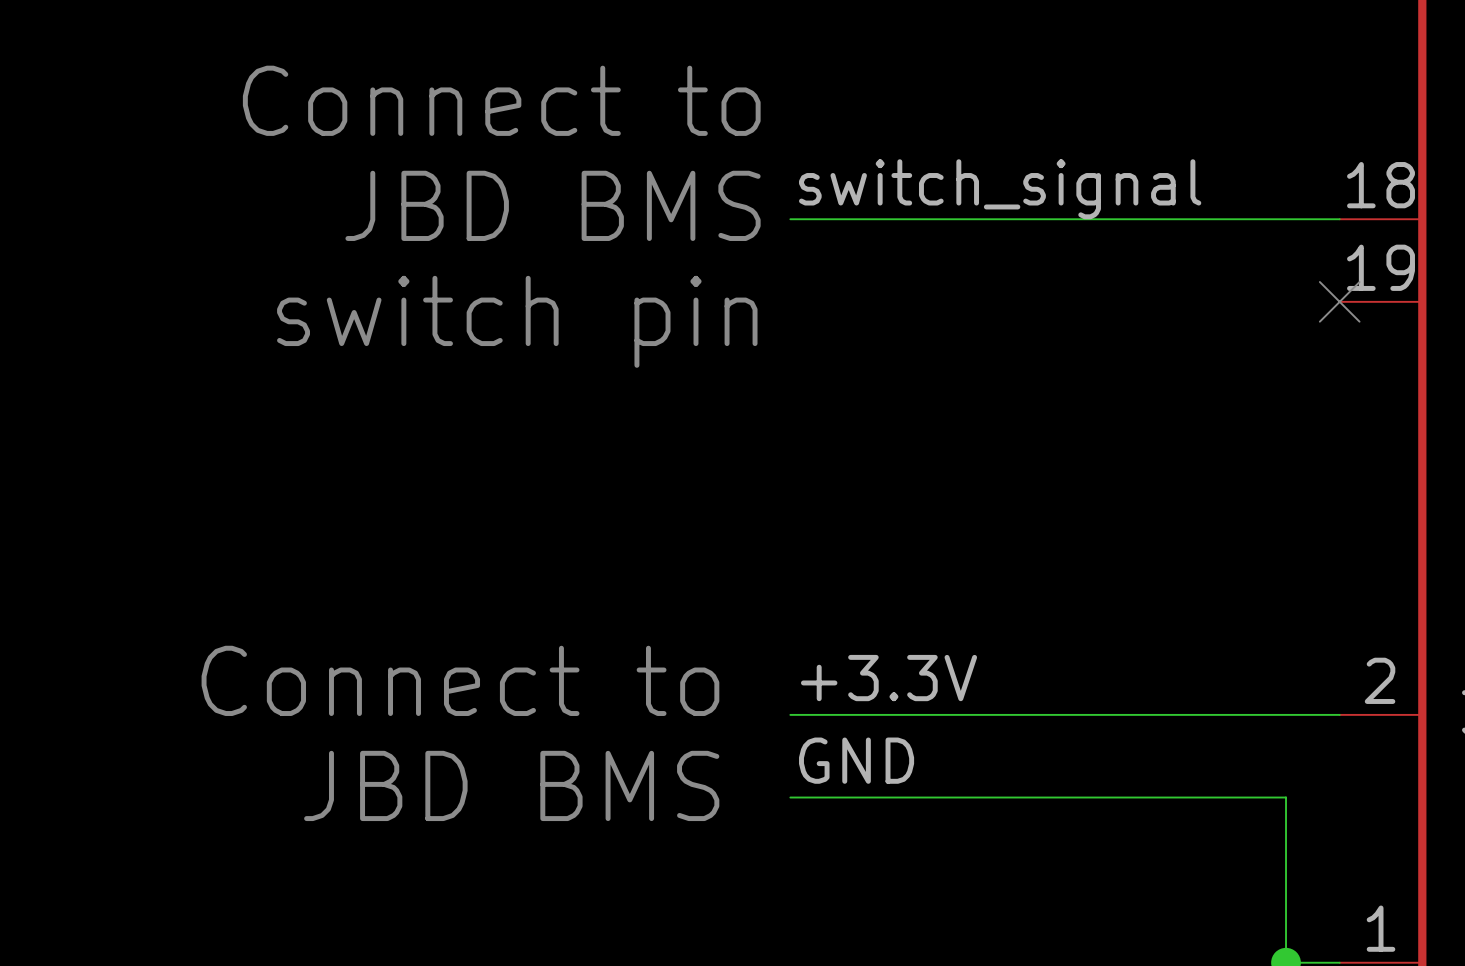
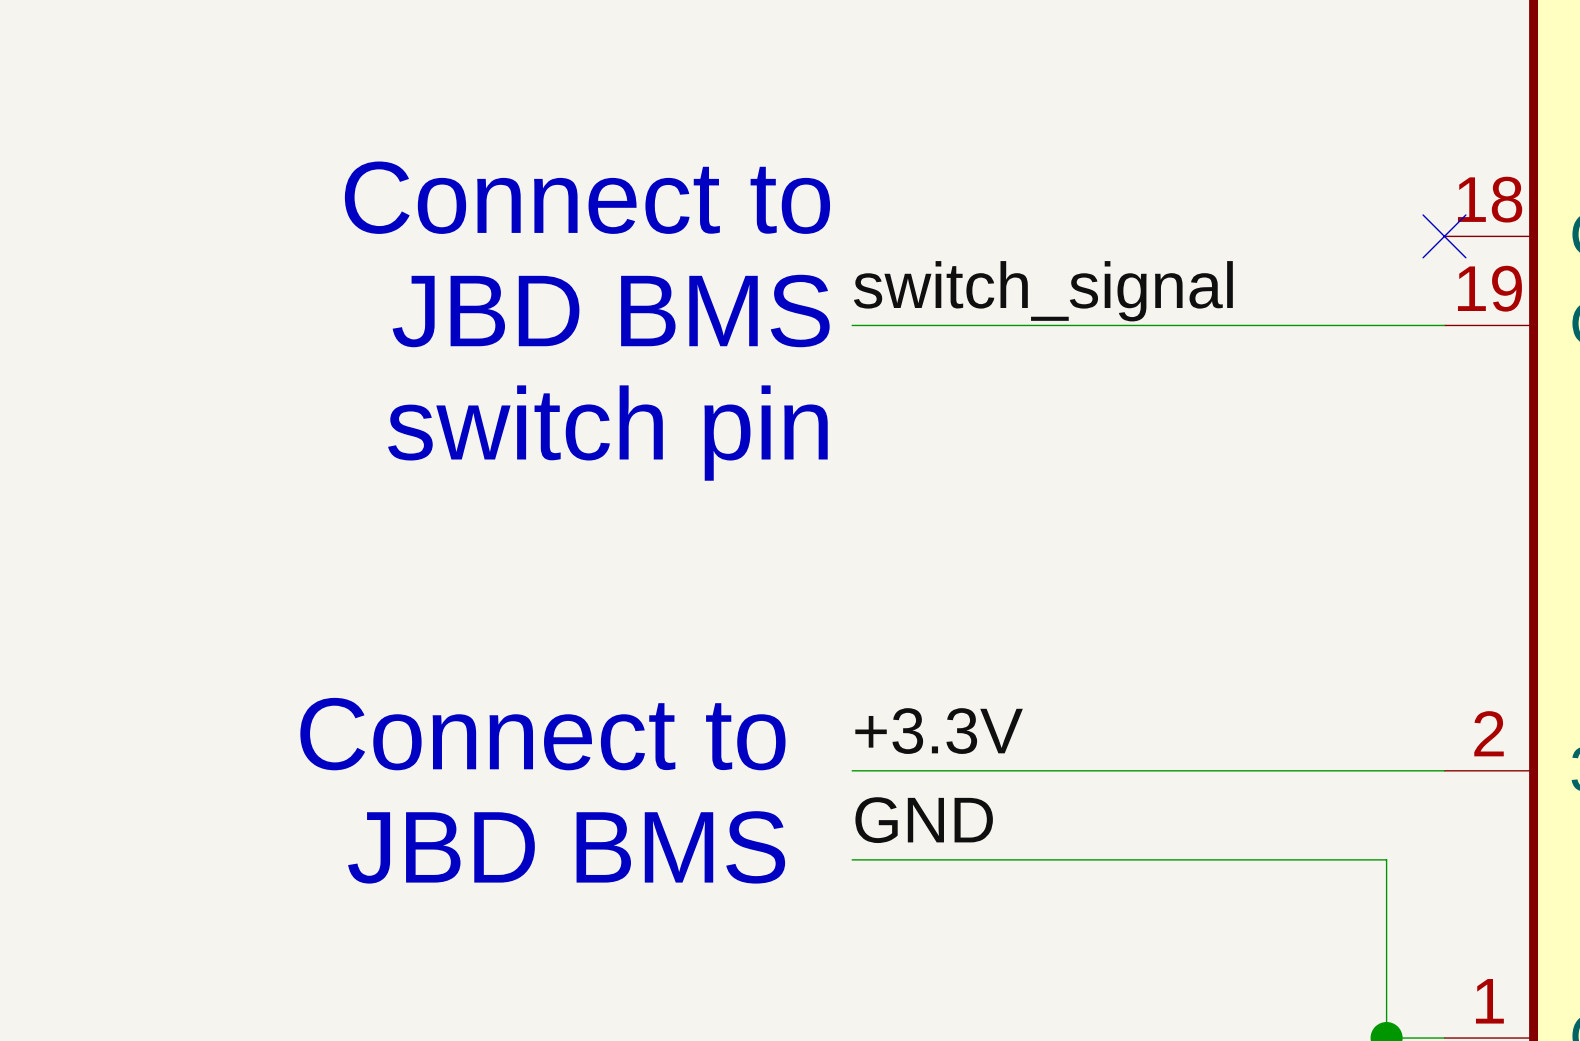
text position: Connect to (501, 100) -> Connect to (587, 197)
label position: switch_signal (1000, 189) -> switch_signal (1043, 291)
text position: JBD BMS (553, 205) -> JBD BMS (611, 311)
wire: (790, 219) (1339, 219) -> (852, 325) (1444, 325)
no-connect mark position: (1339, 301) -> (1444, 236)
text position: switch pin (517, 321) -> switch pin (607, 433)

